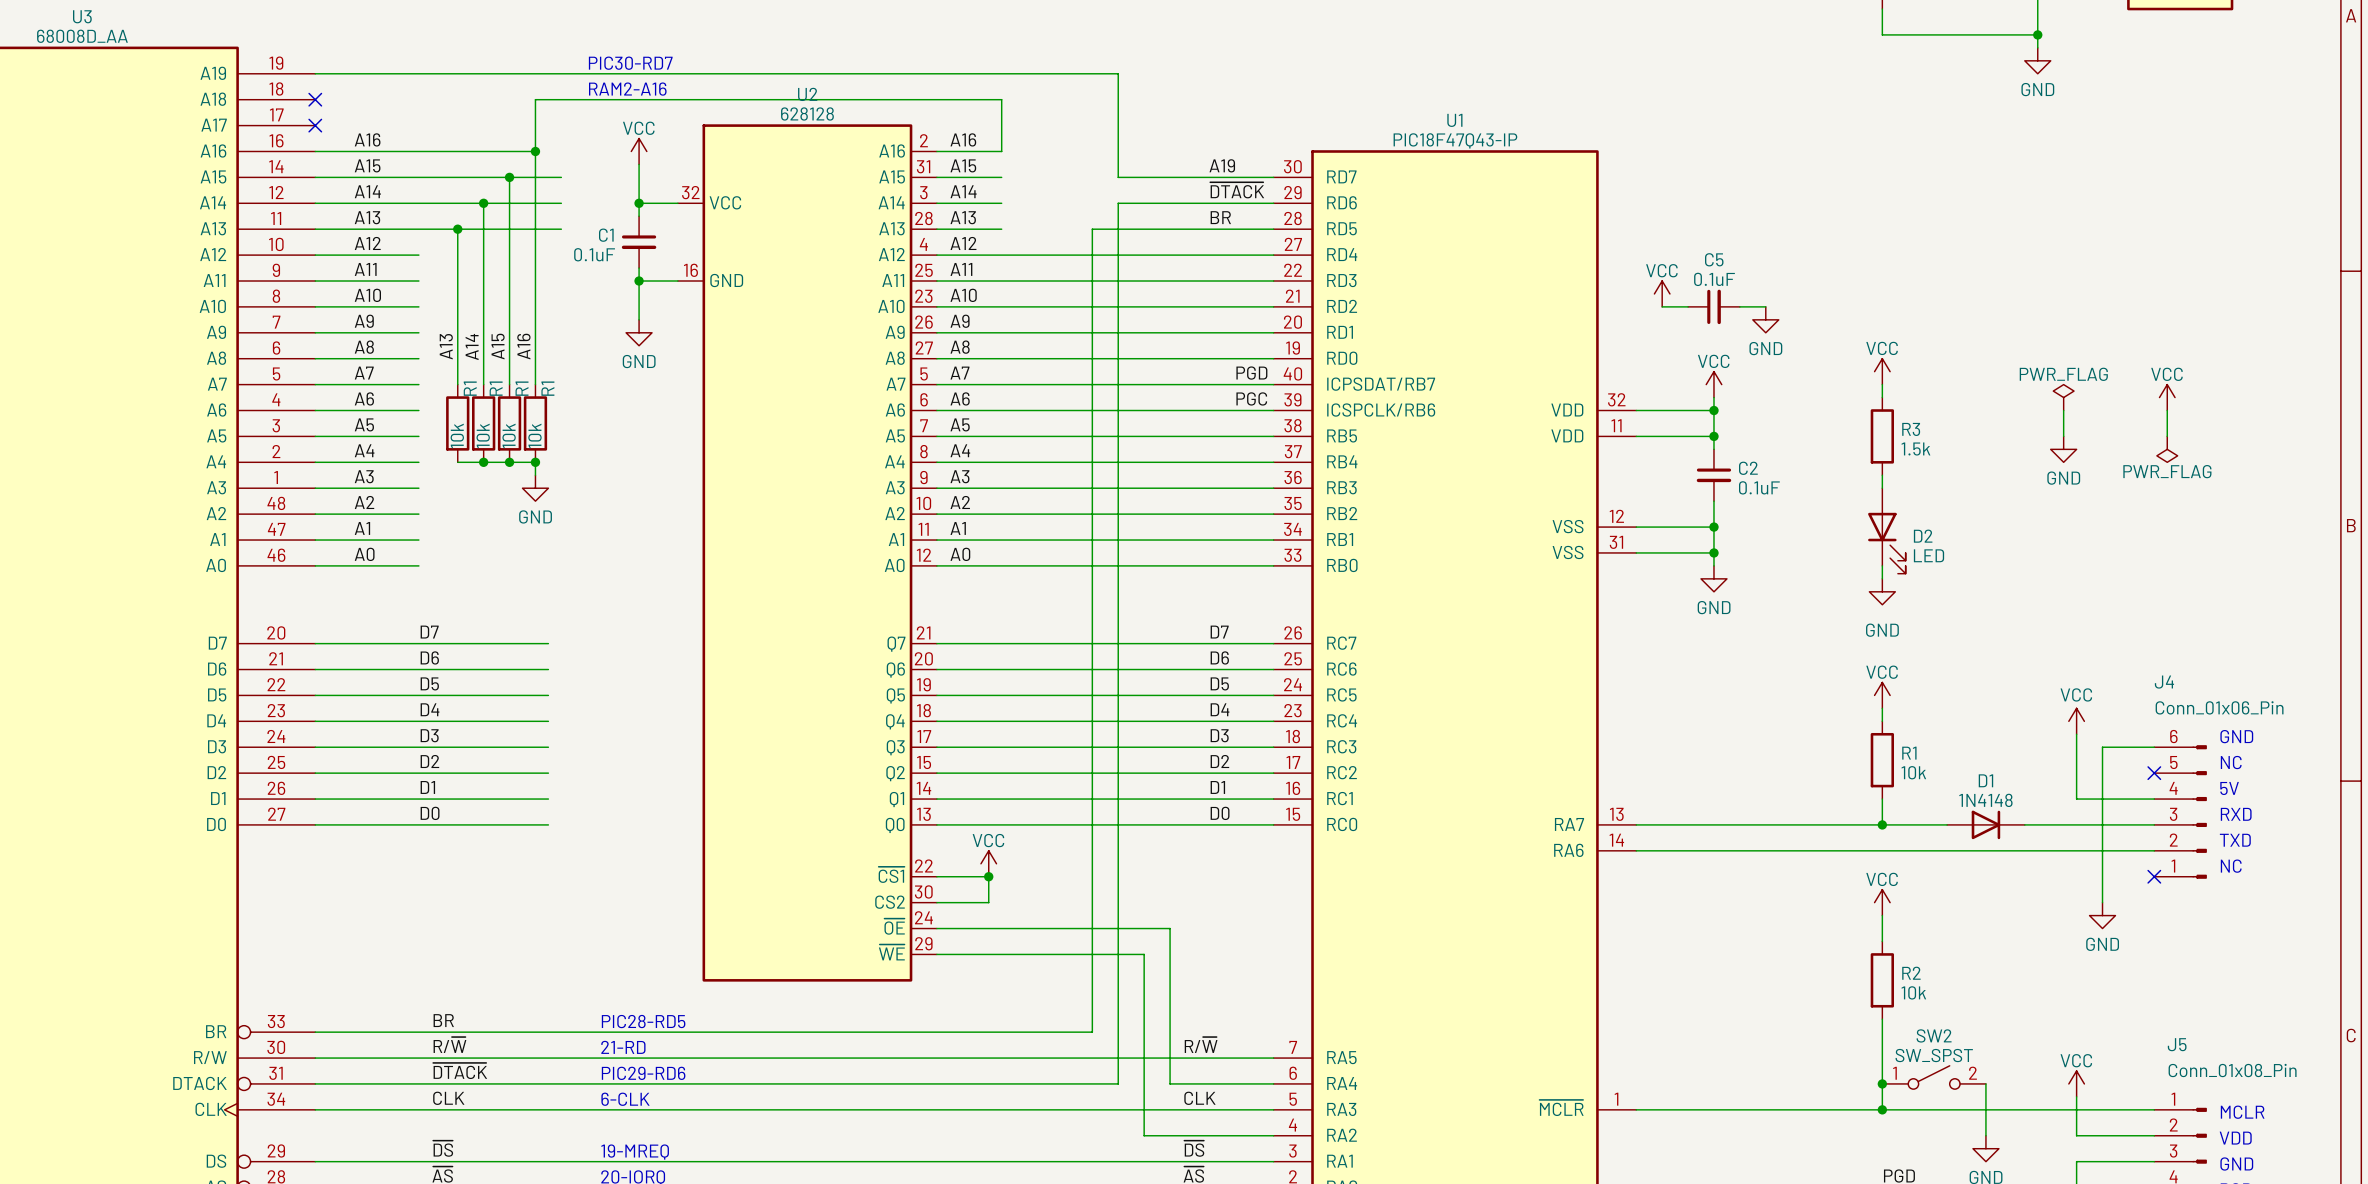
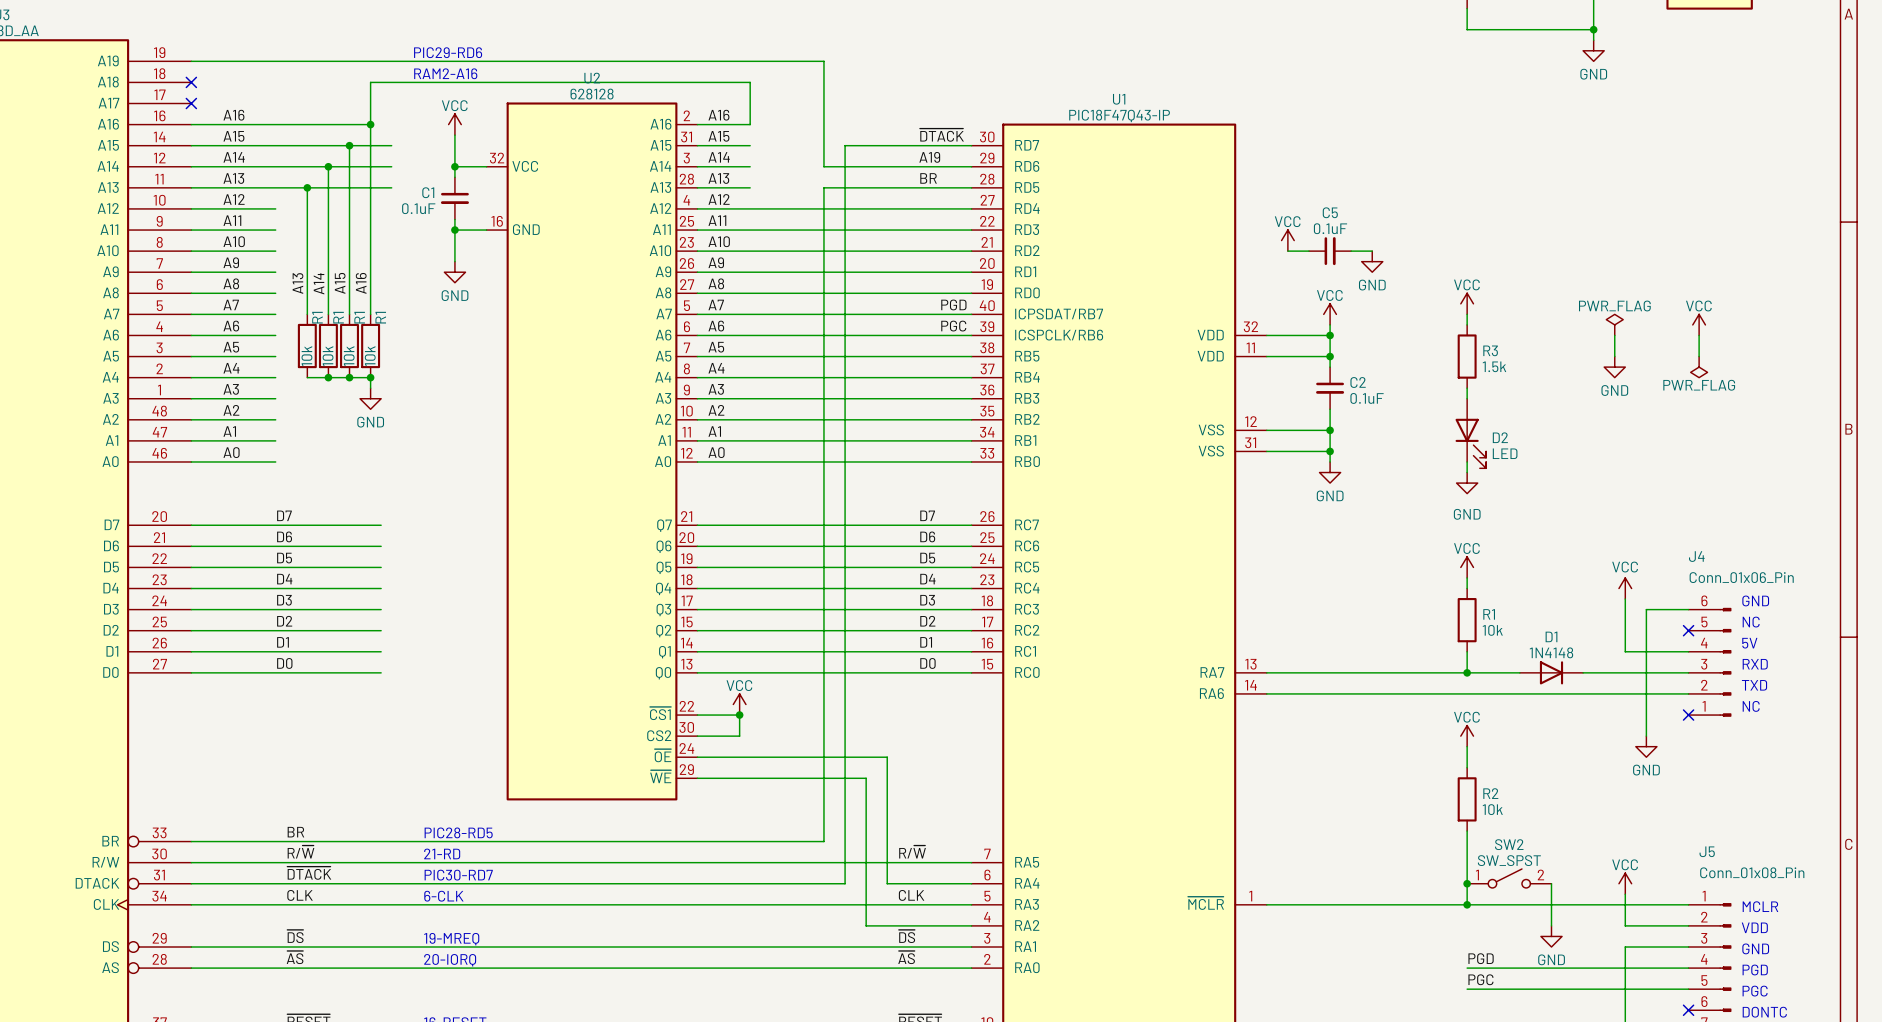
text: PIC30-RD7 (630, 63) -> PIC29-RD6 (448, 52)
wire: (1092, 73) (1118, 73) (1118, 177) -> (823, 61) (823, 166) (845, 166) (845, 145)
label: A19 (1222, 165) -> ~{DTACK} (941, 135)
label: ~{DTACK} (1237, 190) -> A19 (929, 157)
text: PIC29-RD6 (643, 1073) -> PIC30-RD7 (458, 875)

